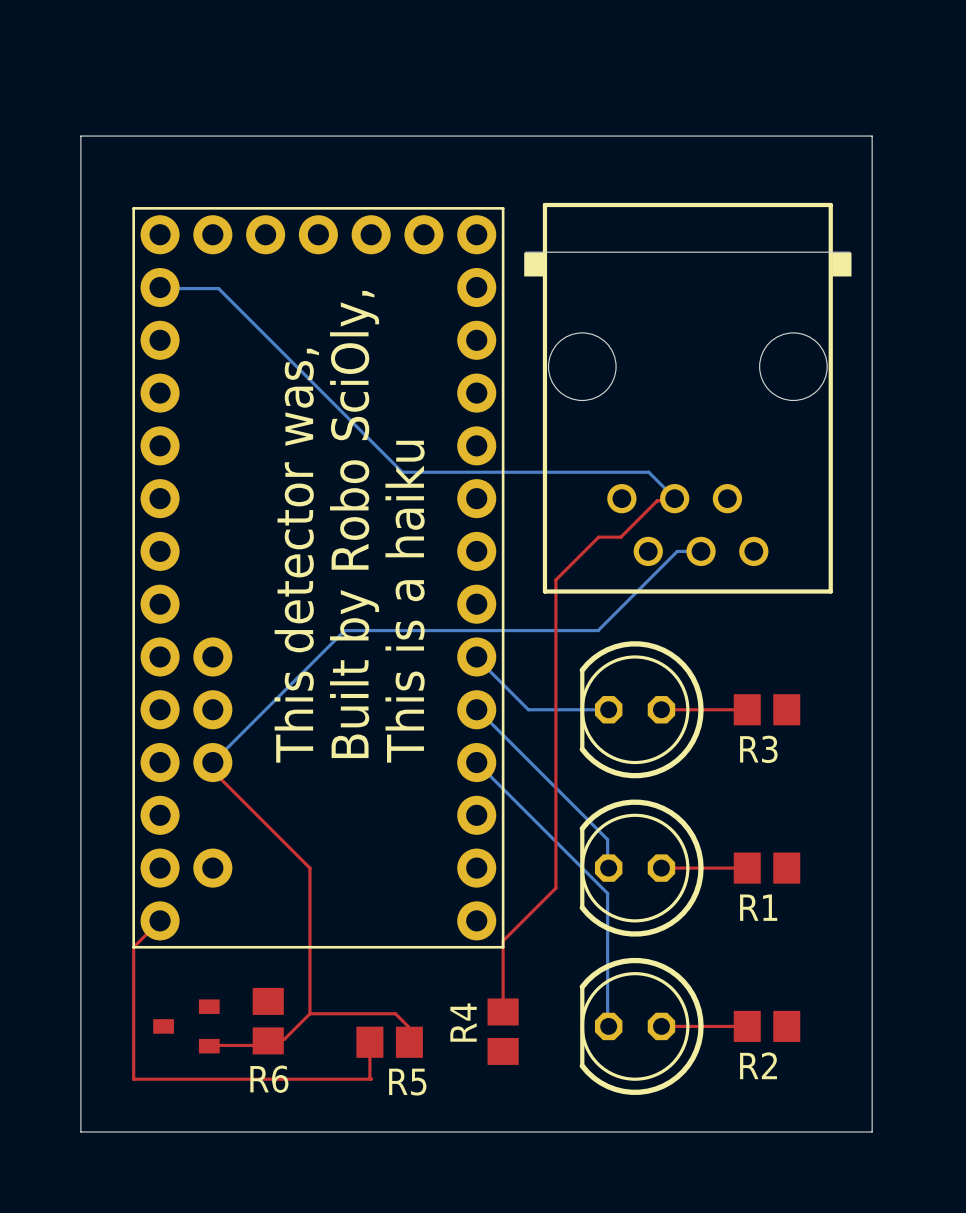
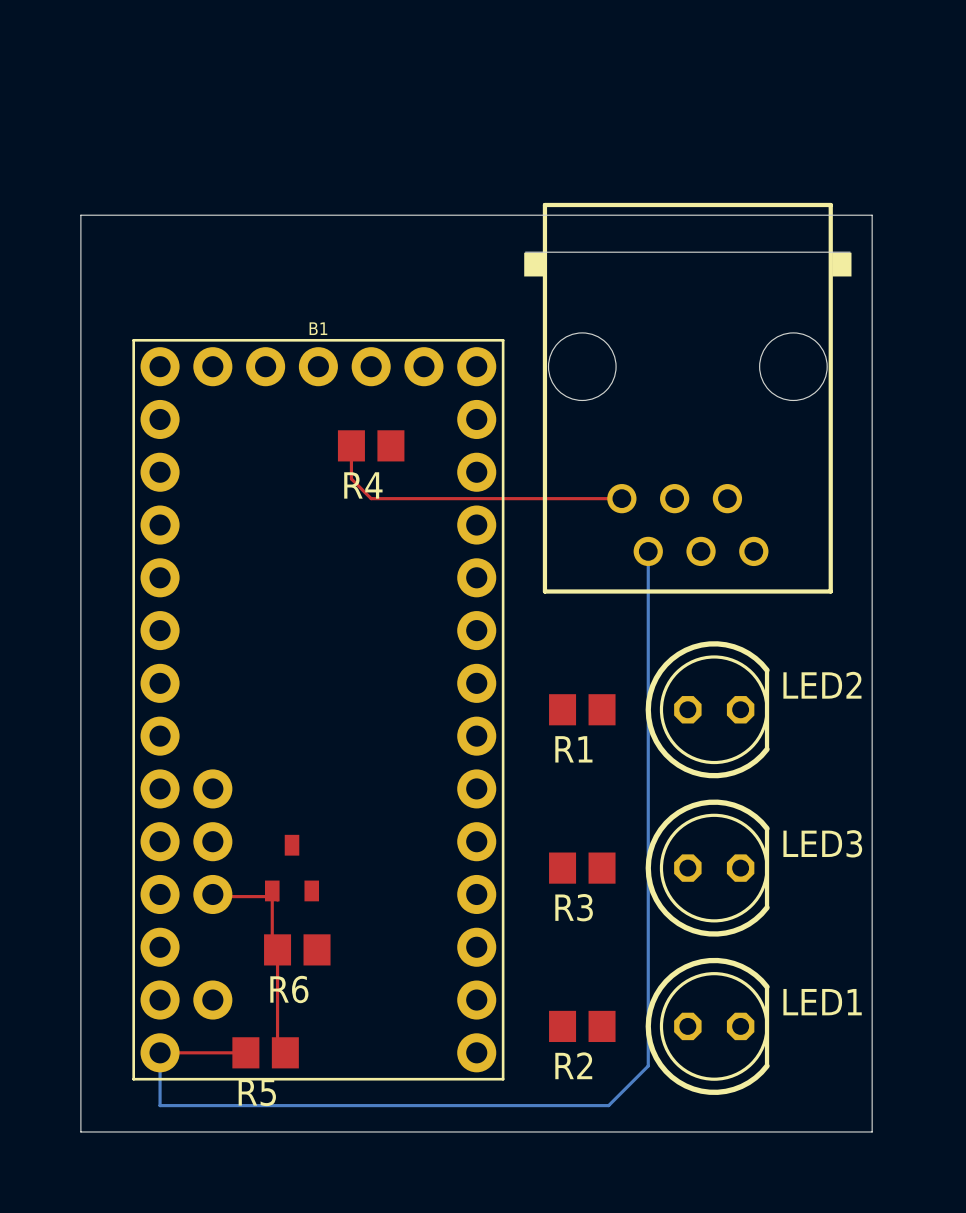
board edge: (80, 215) (80, 136) (872, 136) (872, 215) -> (80, 215) (872, 215)
bottom track: (160, 287) (218, 288) (402, 472) (648, 472) (674, 498) -> none
top track: none -> (351, 445) (351, 478) (371, 498) (621, 498)
top track: (674, 498) (674, 500) (657, 500) (620, 537) (598, 537) (555, 579) (555, 888) (503, 940) (503, 1011) -> none
text: Built by Robo SciOly, (354, 524) -> none
bottom track: none -> (648, 551) (648, 1066) (608, 1105) (160, 1105) (160, 1052)
bottom track: (701, 551) (677, 551) (598, 630) (344, 630) (212, 762) -> none
text: This detector was, (296, 555) -> none
part: (318, 577) -> none
text: This is a haiku (405, 601) -> none
bottom track: (476, 656) (528, 709) (608, 709) -> none
B1: none -> (318, 709)
bottom track: (476, 709) (607, 839) (608, 868) -> none
part: (641, 709) -> none
top track: (661, 709) (747, 709) -> none
LED2: none -> (707, 709)
R3 position: (767, 709) -> (582, 868)
top track: (212, 762) (214, 763) (214, 773) (309, 868) (309, 1013) -> none
bottom track: (476, 762) (607, 893) (608, 1026) -> none
part: (641, 868) -> none
top track: (661, 868) (747, 868) -> none
LED3: none -> (707, 868)
R1 position: (767, 868) -> (582, 709)
top track: none -> (272, 890) (272, 944) (277, 949) (277, 1045) (285, 1052)
top track: none -> (212, 894) (214, 896) (274, 896) (277, 900)
top track: (160, 920) (133, 947) (133, 1079) (371, 1079) (369, 1042) -> none
top track: (309, 1013) (395, 1013) (408, 1026) (409, 1042) -> none
top track: (309, 1013) (284, 1039) (268, 1039) (262, 1045) (209, 1046) -> none
R6 rotation: 0° (268, 1021) -> 90° clockwise (297, 949)
R6 position: (268, 1021) -> (297, 949)
R4 name position: R4 (463, 1022) -> R4 (363, 485)
part rotation: 0° (186, 1026) -> 90° clockwise (292, 868)
part position: (186, 1026) -> (292, 868)
part: (641, 1026) -> none
top track: (661, 1026) (747, 1026) -> (160, 1052) (245, 1052)
LED1: none -> (707, 1026)
R2 position: (767, 1026) -> (582, 1026)
R4 rotation: 0° (503, 1031) -> 90° clockwise (371, 445)
R4 position: (503, 1031) -> (371, 445)
R5 position: (389, 1042) -> (265, 1052)
R5 name position: R5 (407, 1082) -> R5 (257, 1092)

